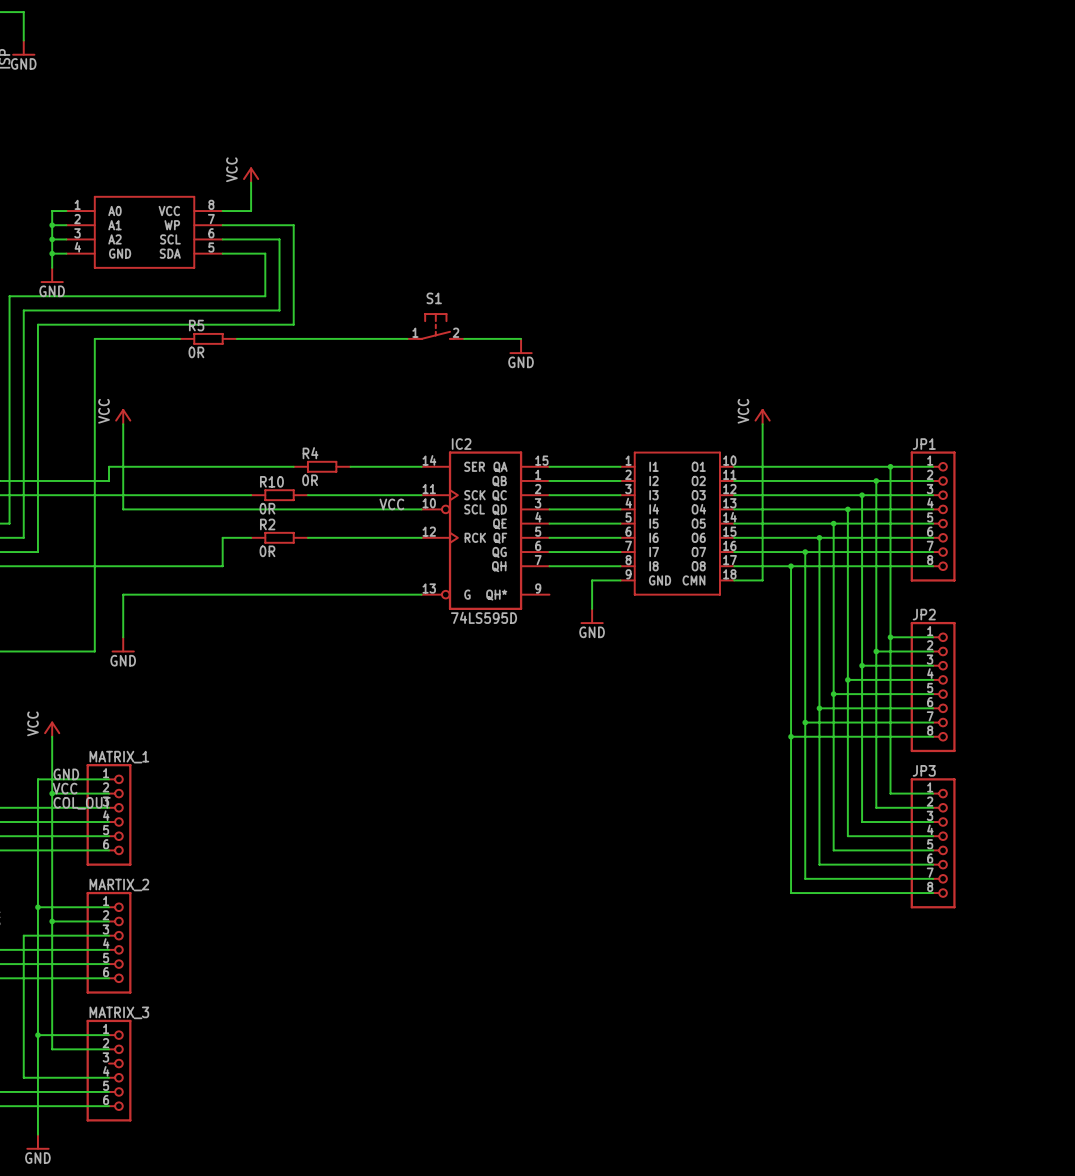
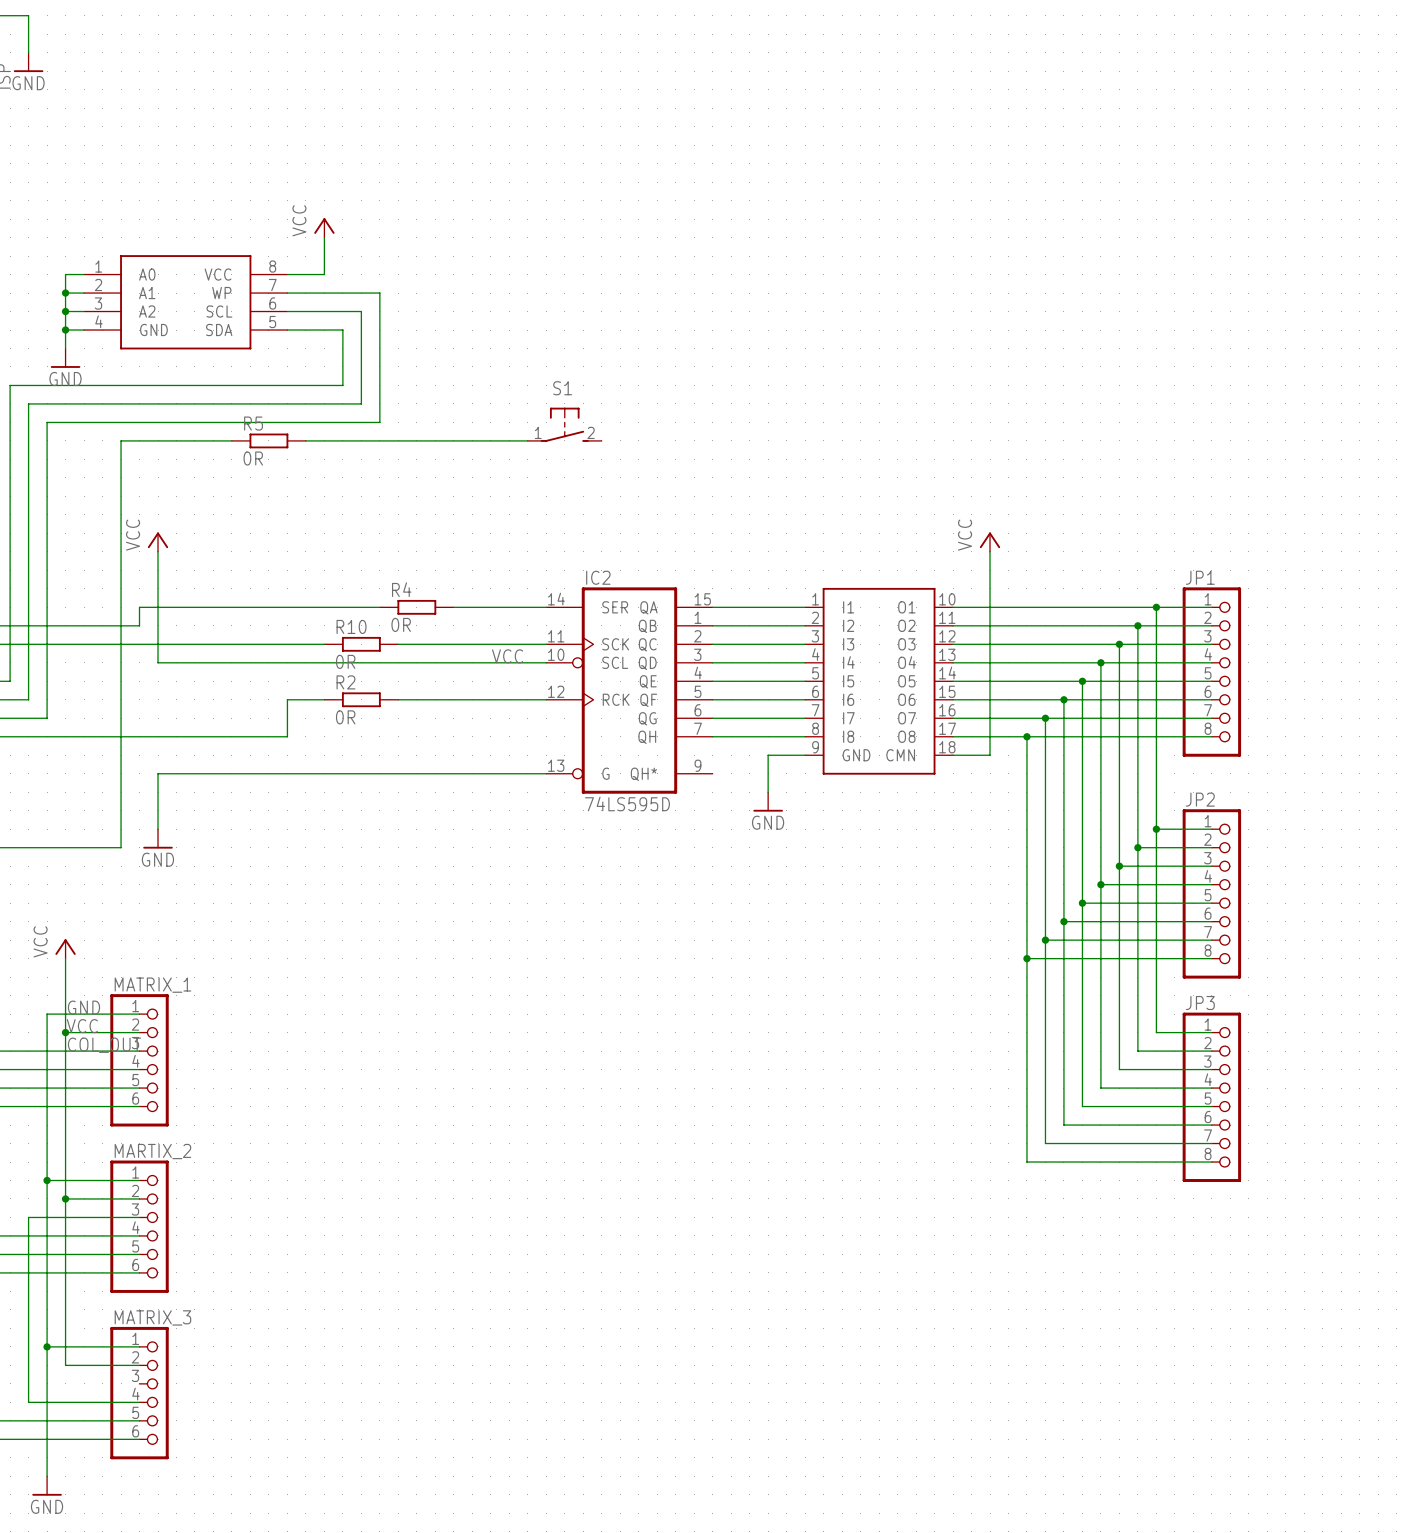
wire: (464, 338) (521, 338) -> none
power symbol: GND (521, 346) -> none

